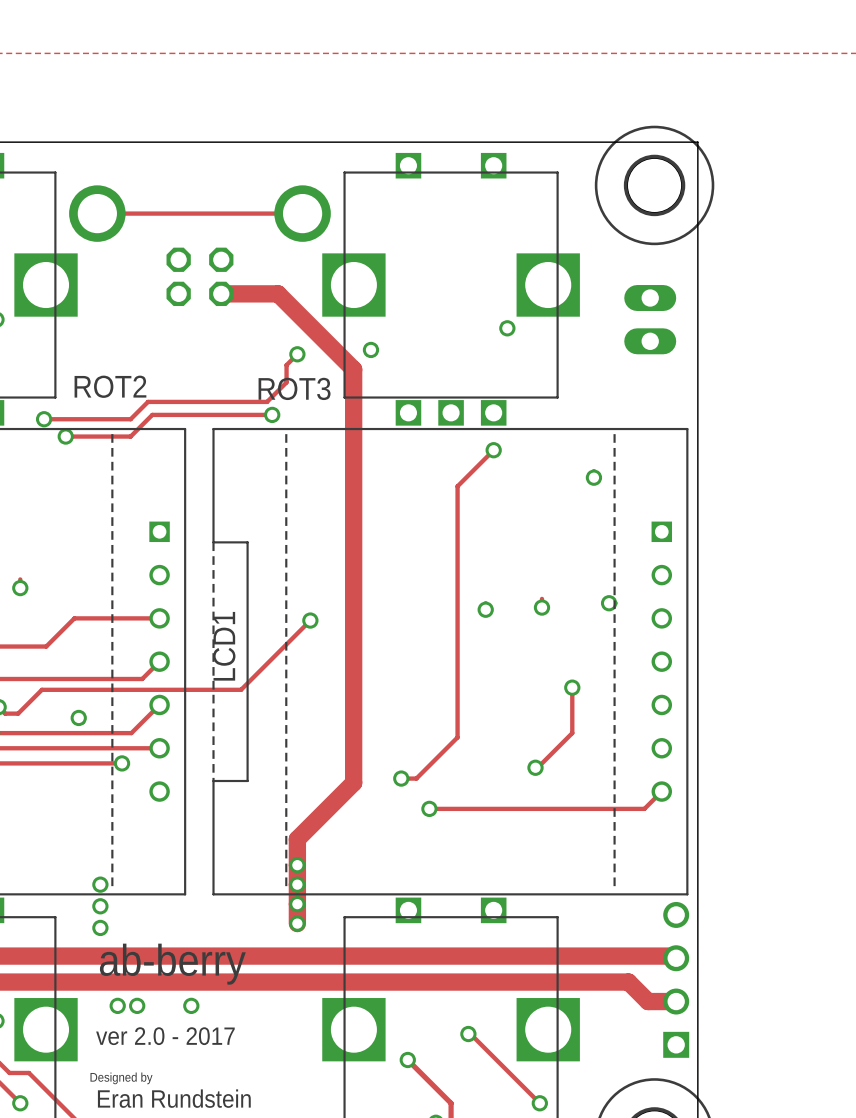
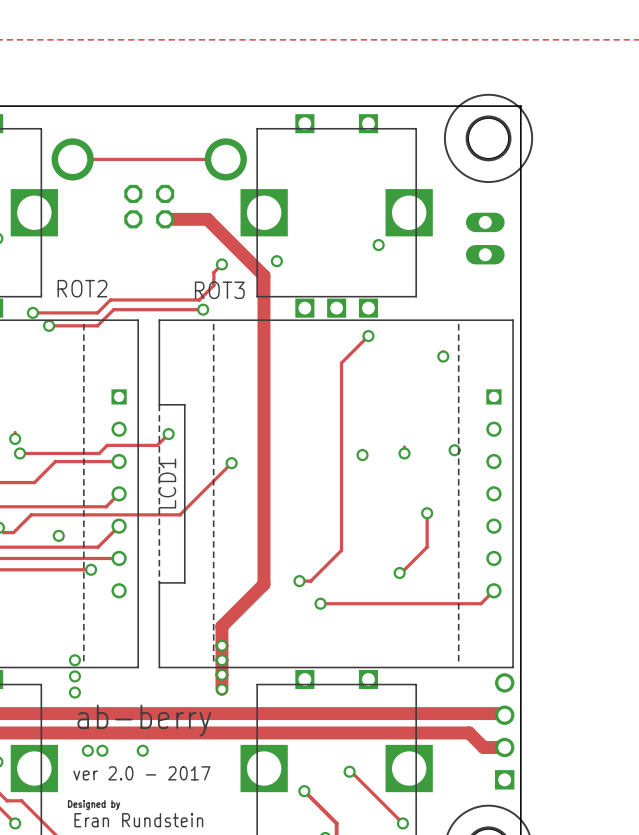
track: none -> (168, 434) (157, 445) (107, 445) (99, 453) (19, 453)
via: none -> (168, 434)
via: none -> (19, 453)

